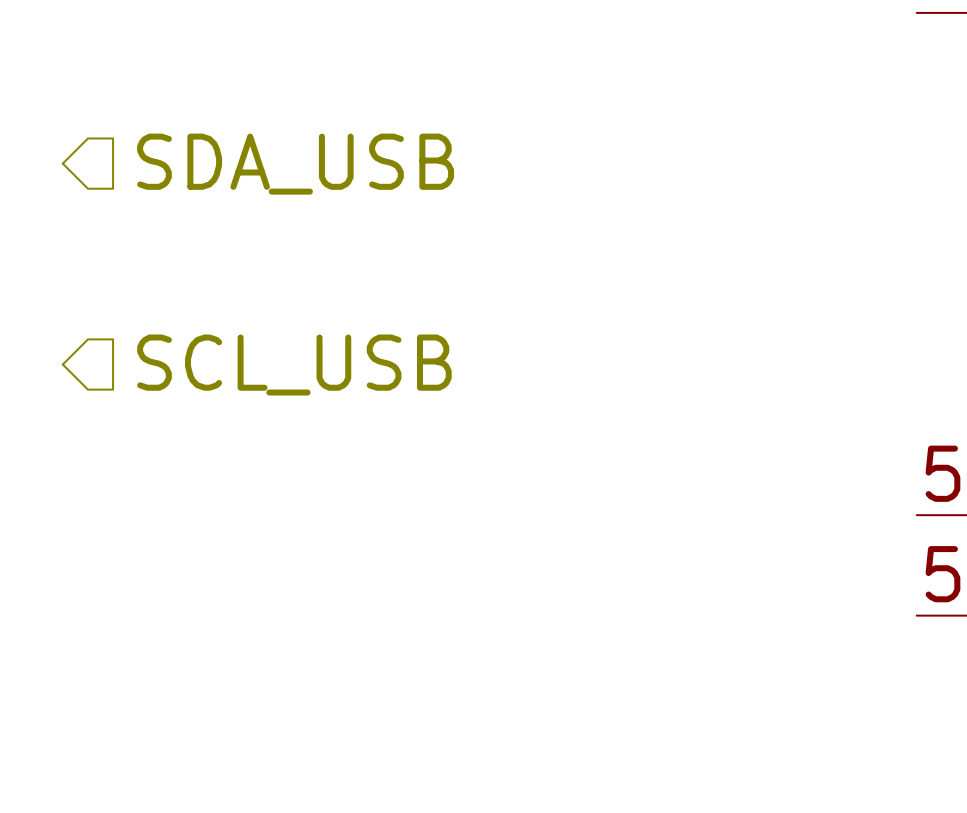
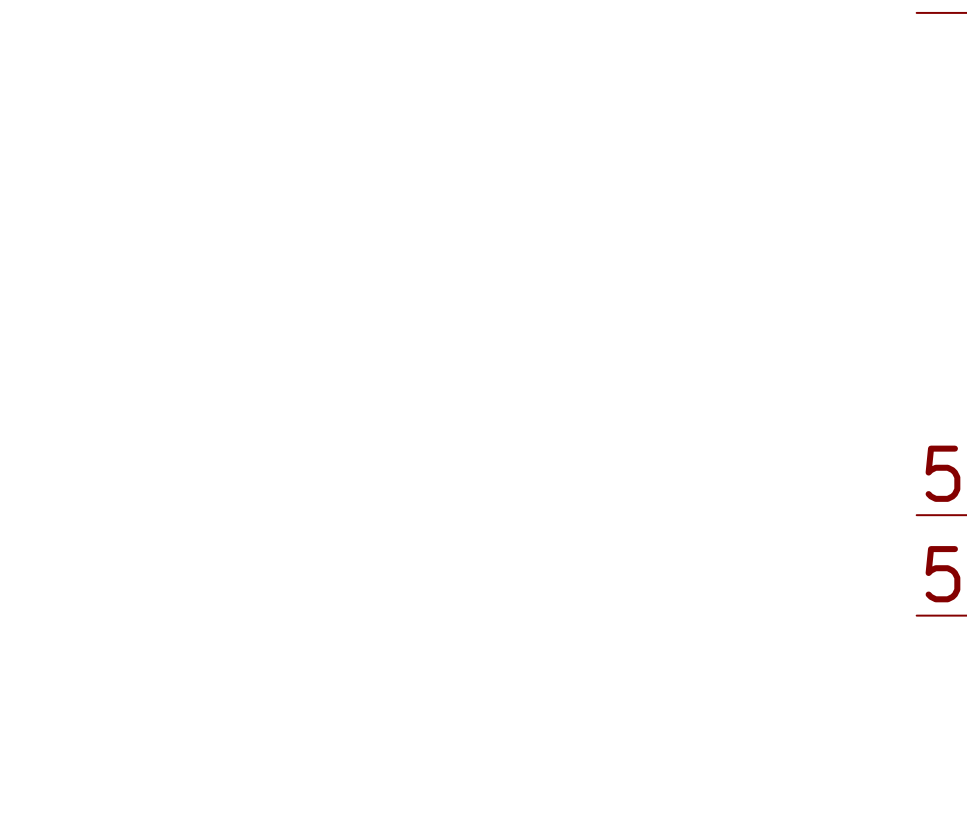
hierarchical label: SDA_USB (295, 164) -> none
hierarchical label: SCL_USB (294, 365) -> none

